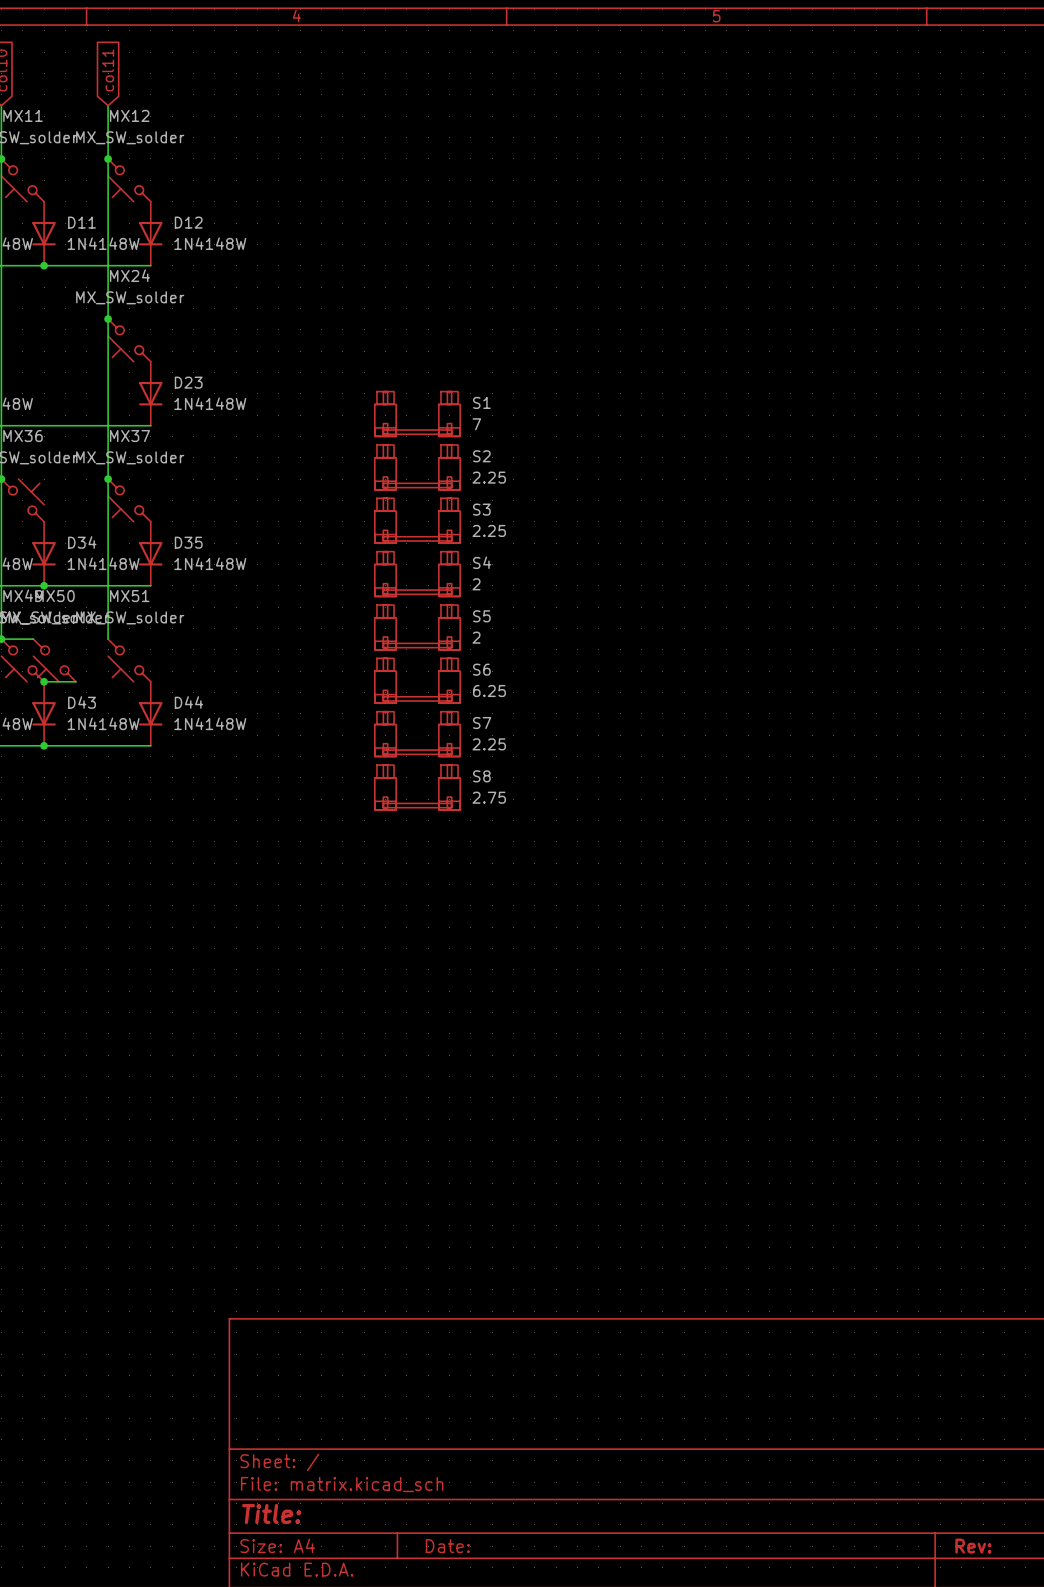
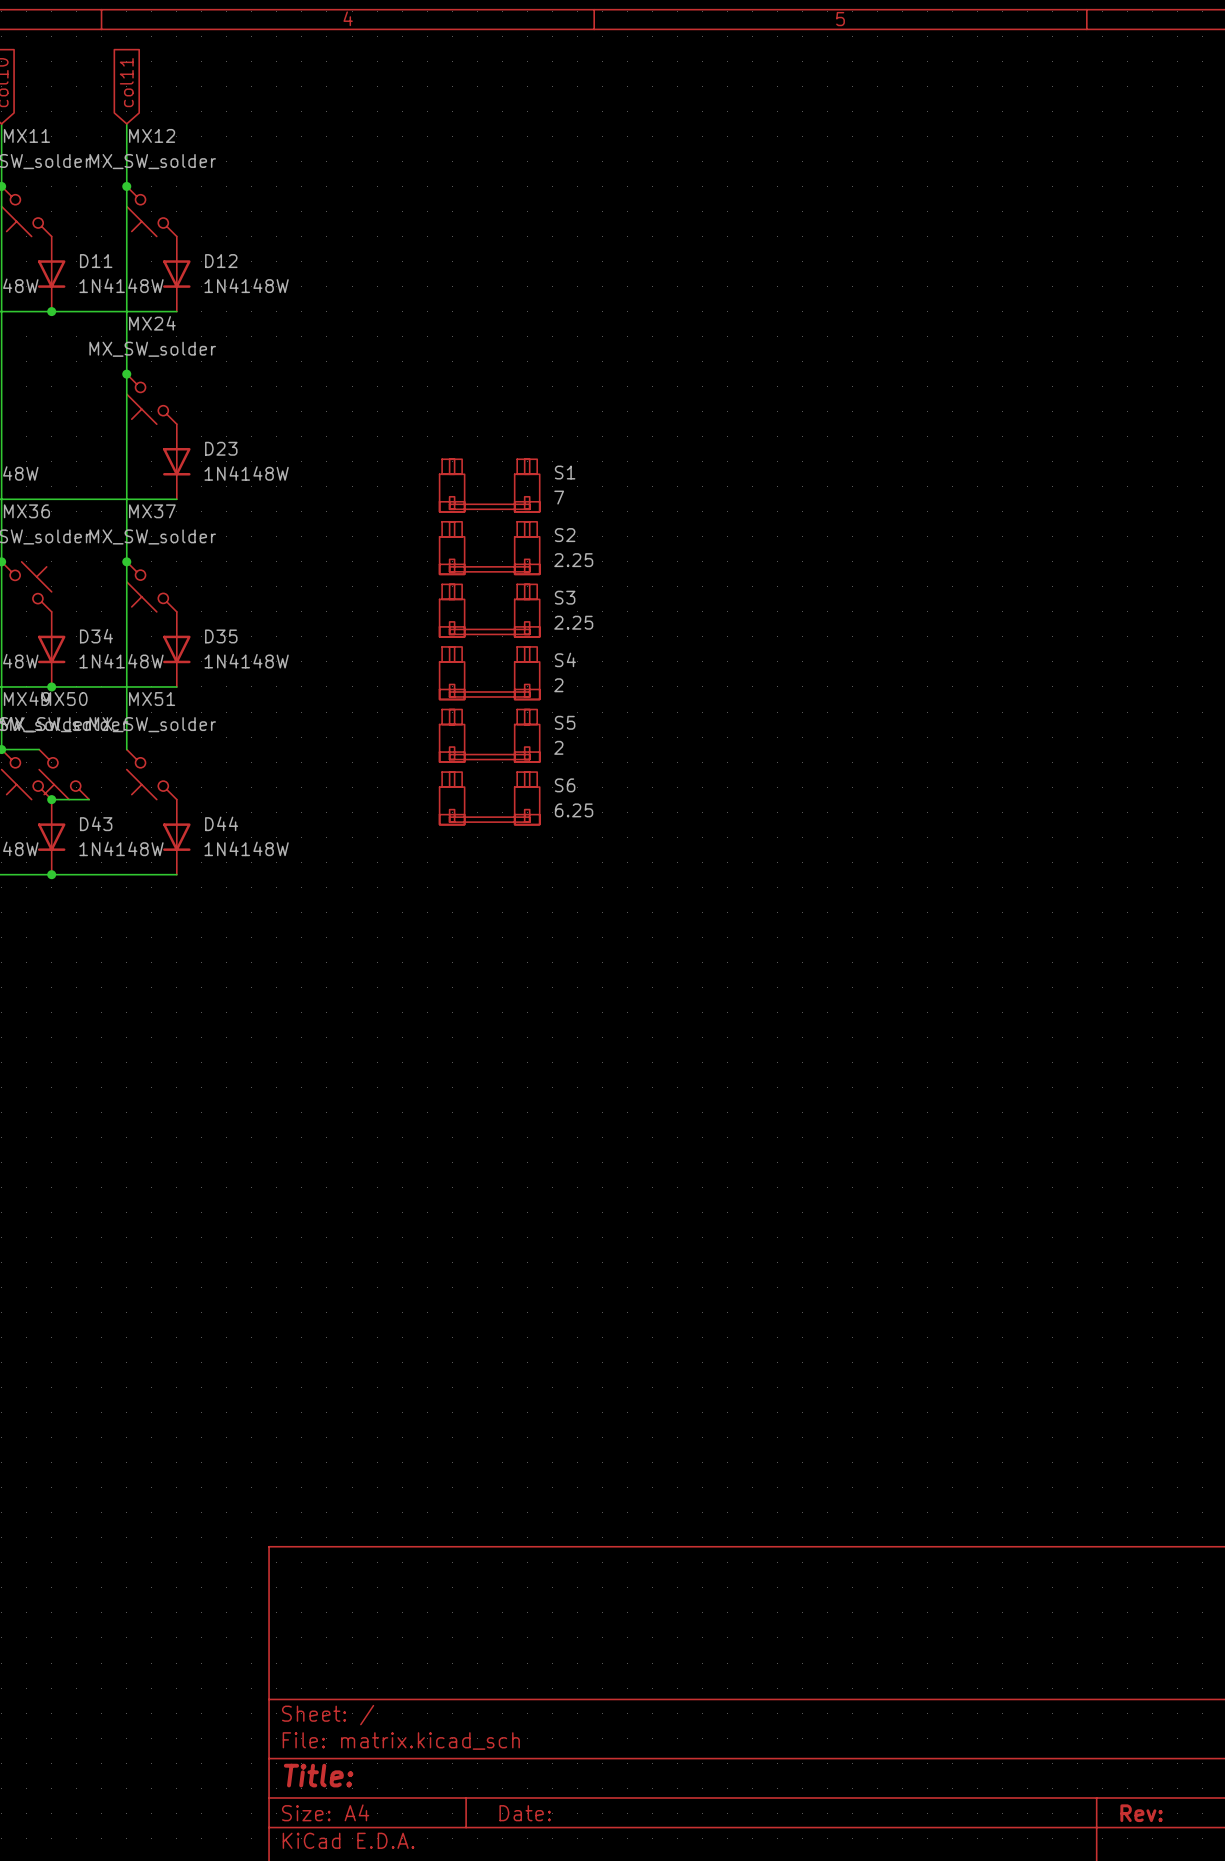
S7: 2.25 (417, 734) -> none
S8: 2.75 (417, 787) -> none

